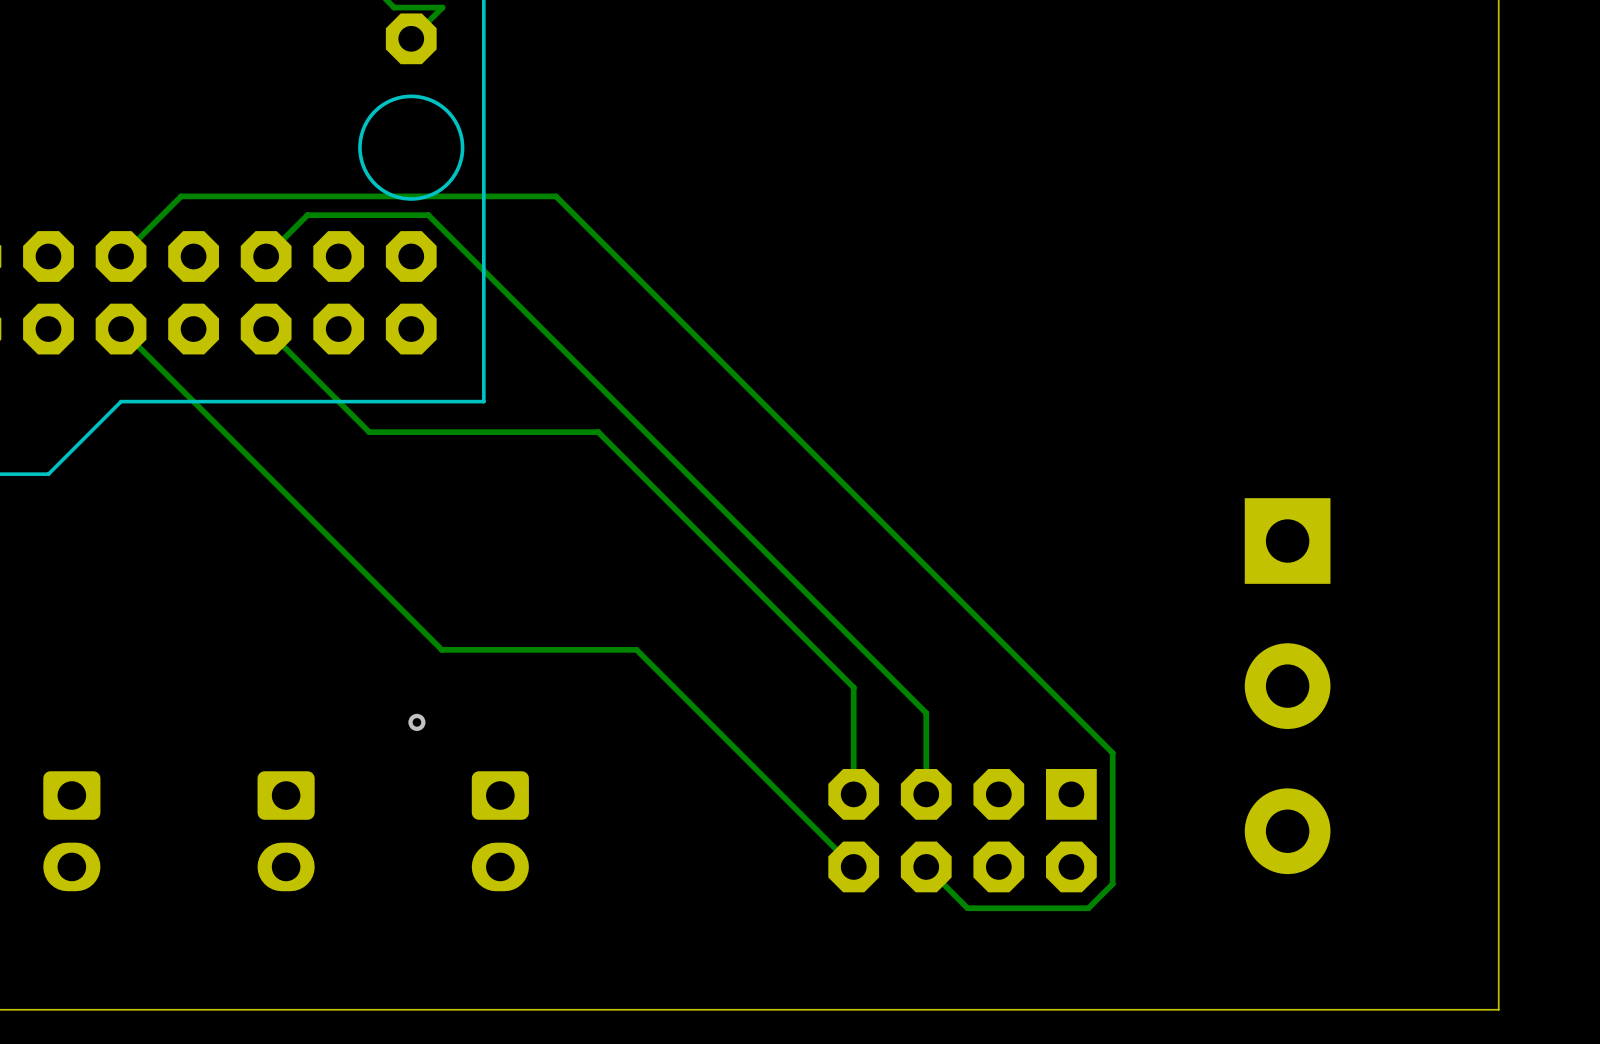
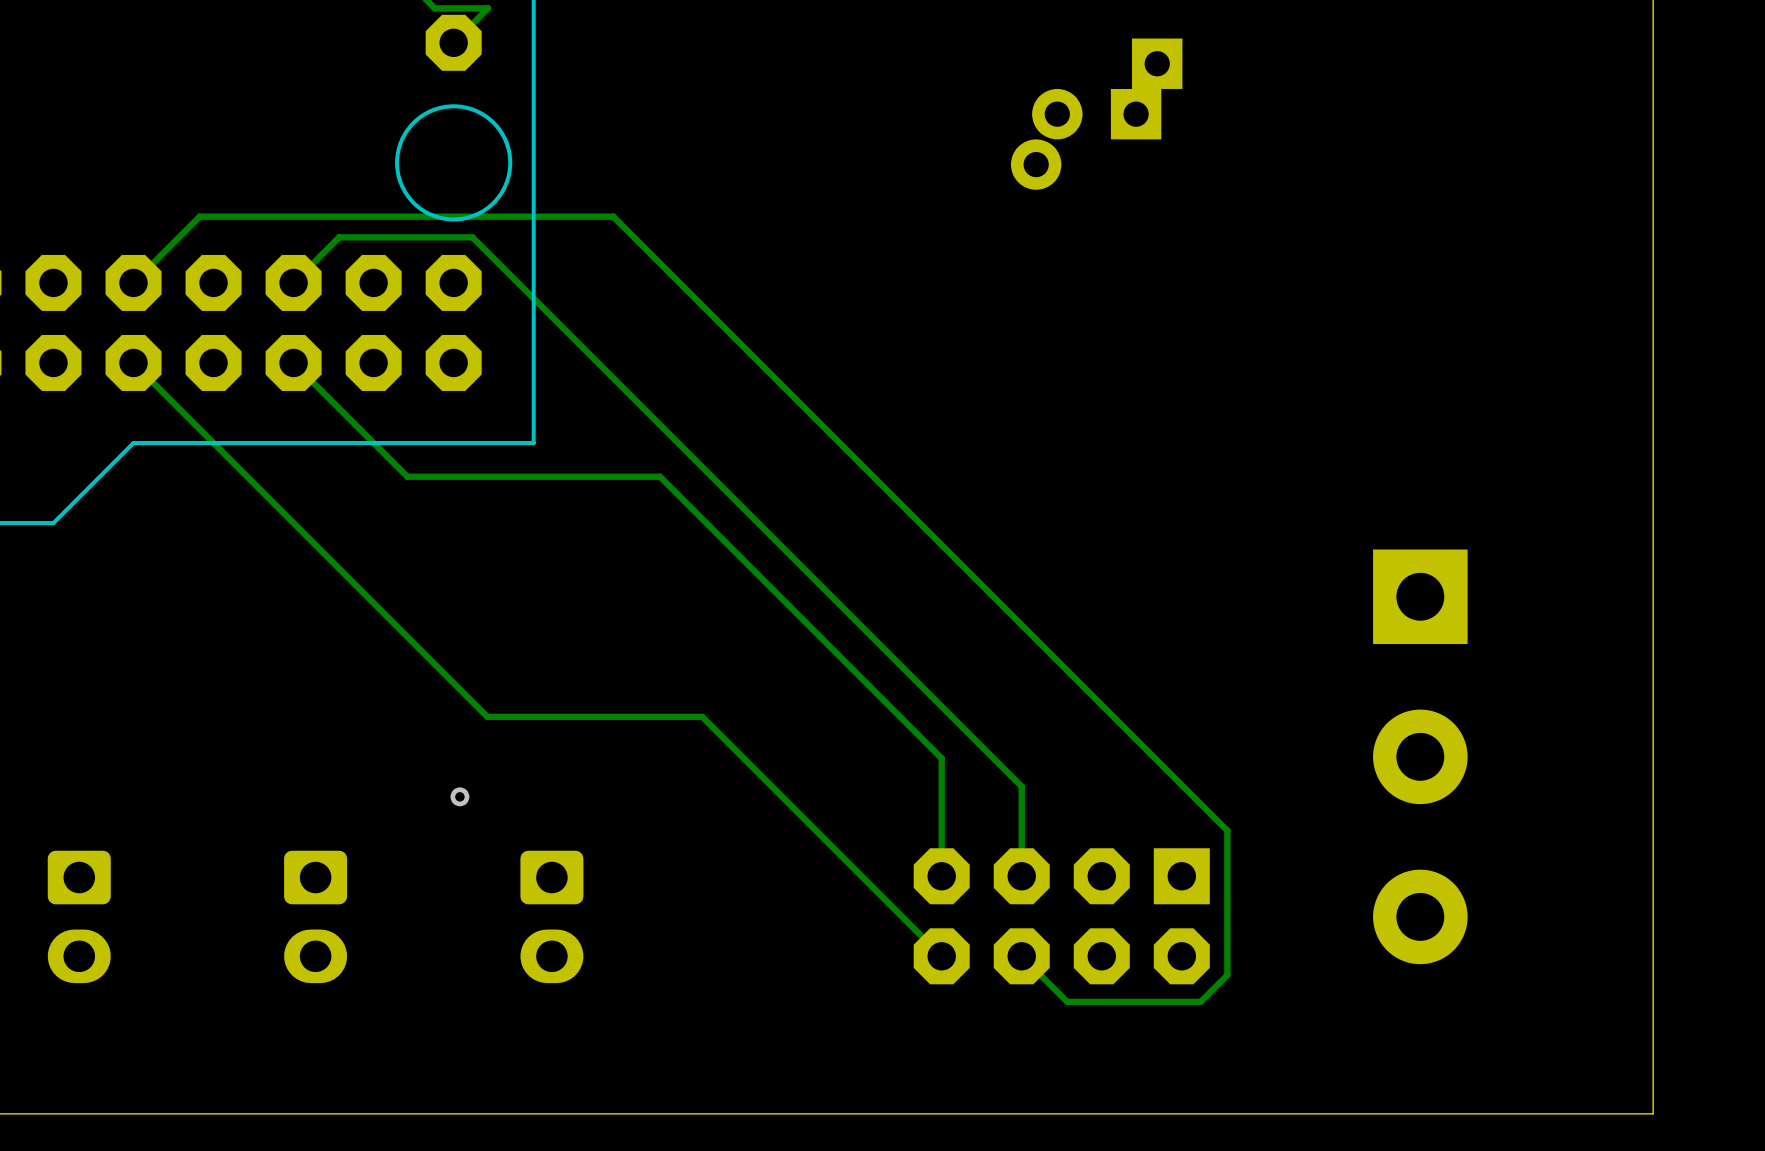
part: none -> (1096, 114)

